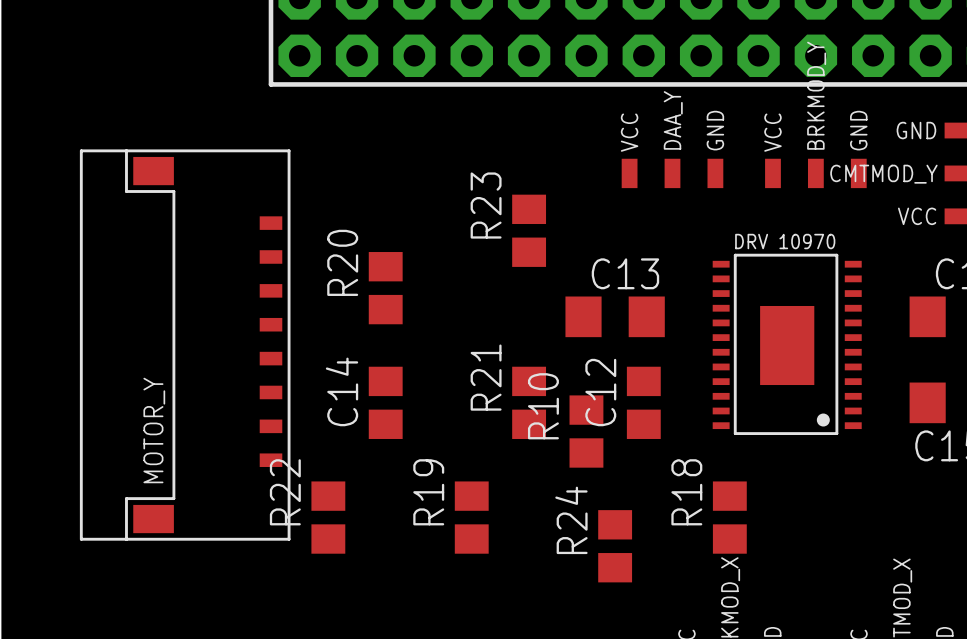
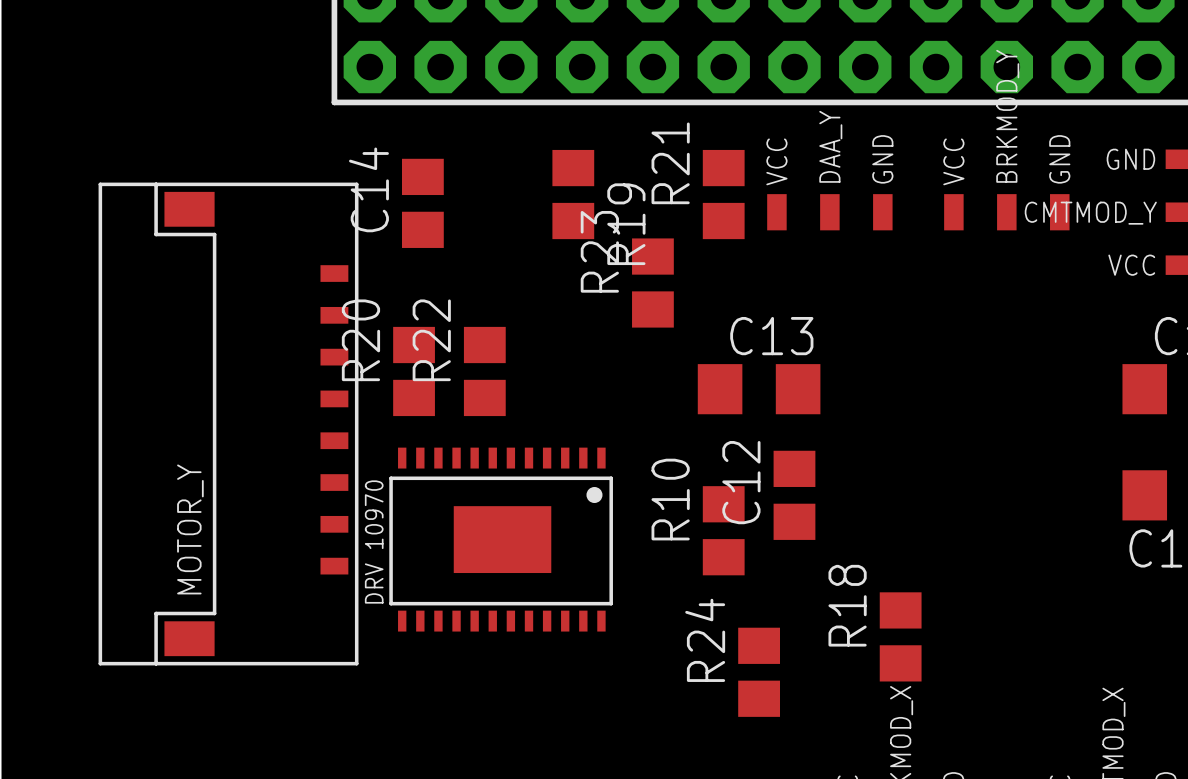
R20 position: (385, 288) -> (414, 371)
part rotation: 0° (787, 344) -> 90° counterclockwise (501, 539)
part position: (787, 344) -> (501, 539)
C14 position: (385, 402) -> (422, 203)
R21 position: (529, 402) -> (723, 194)
R19 name position: R19 (428, 492) -> R19 (626, 224)
R22 position: (328, 517) -> (484, 371)
R19 position: (471, 517) -> (573, 194)

